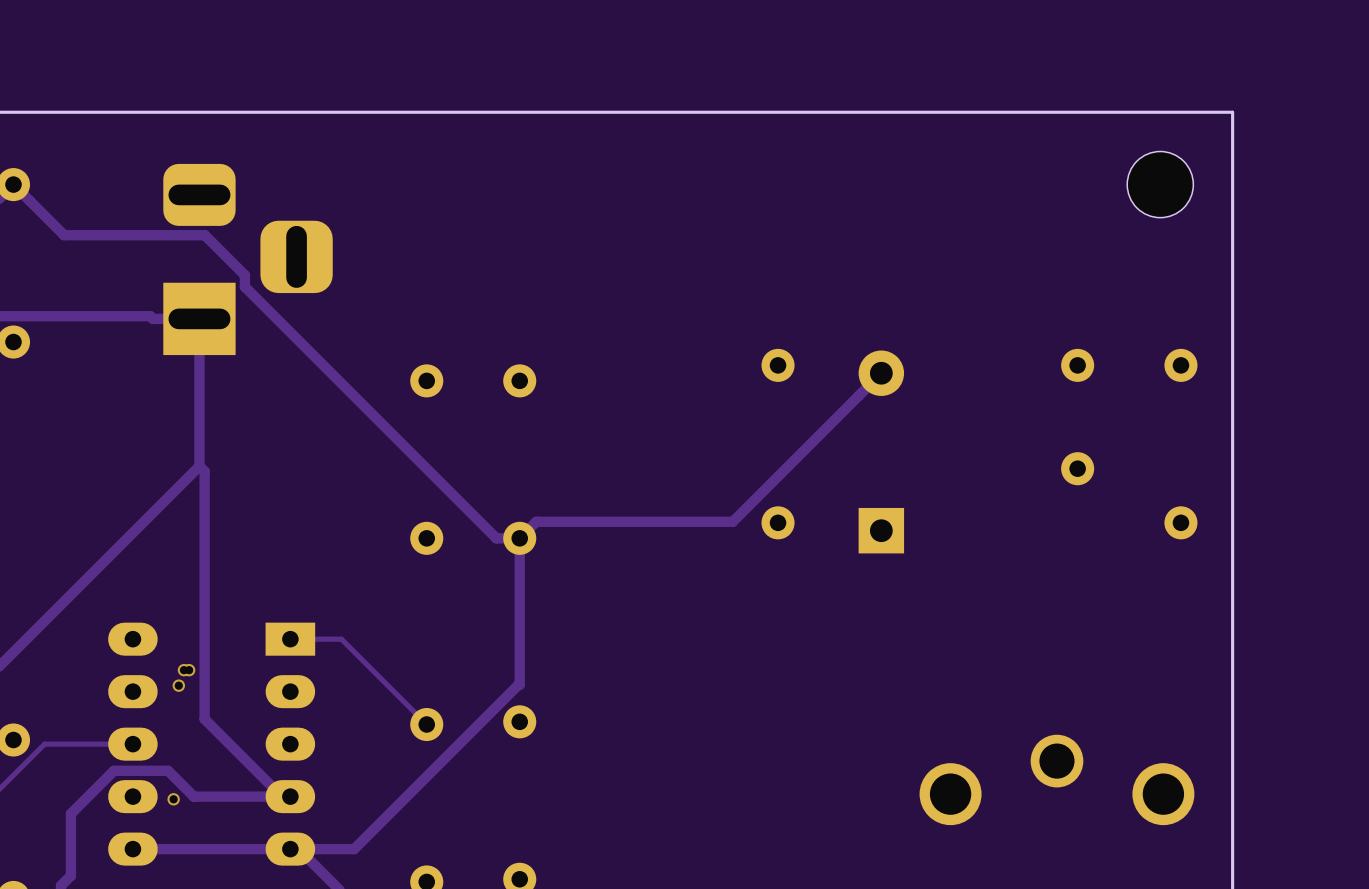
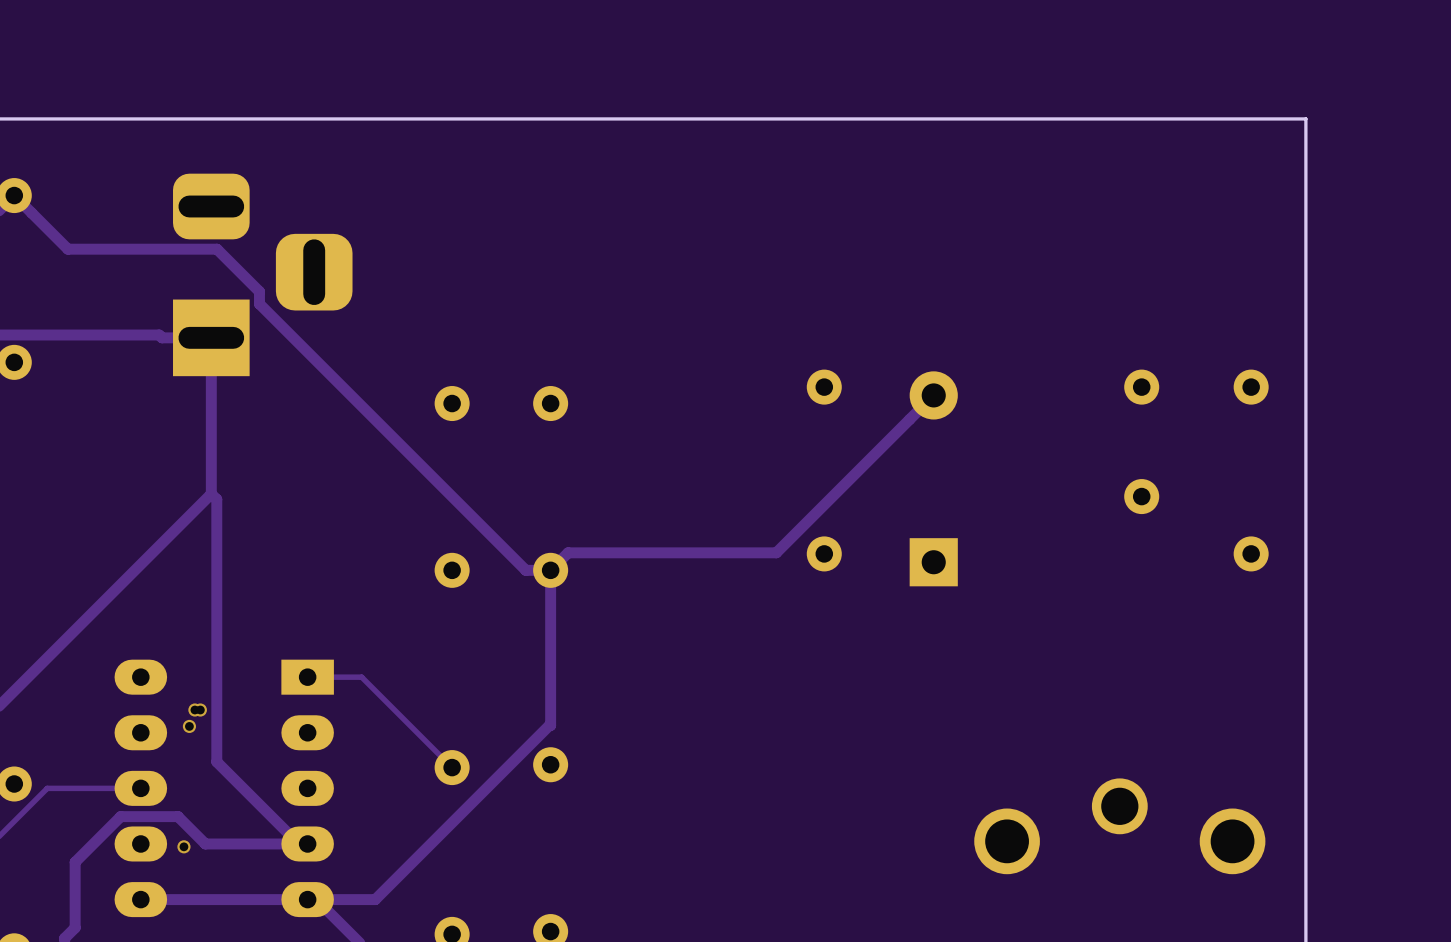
part: (1160, 184) -> none

